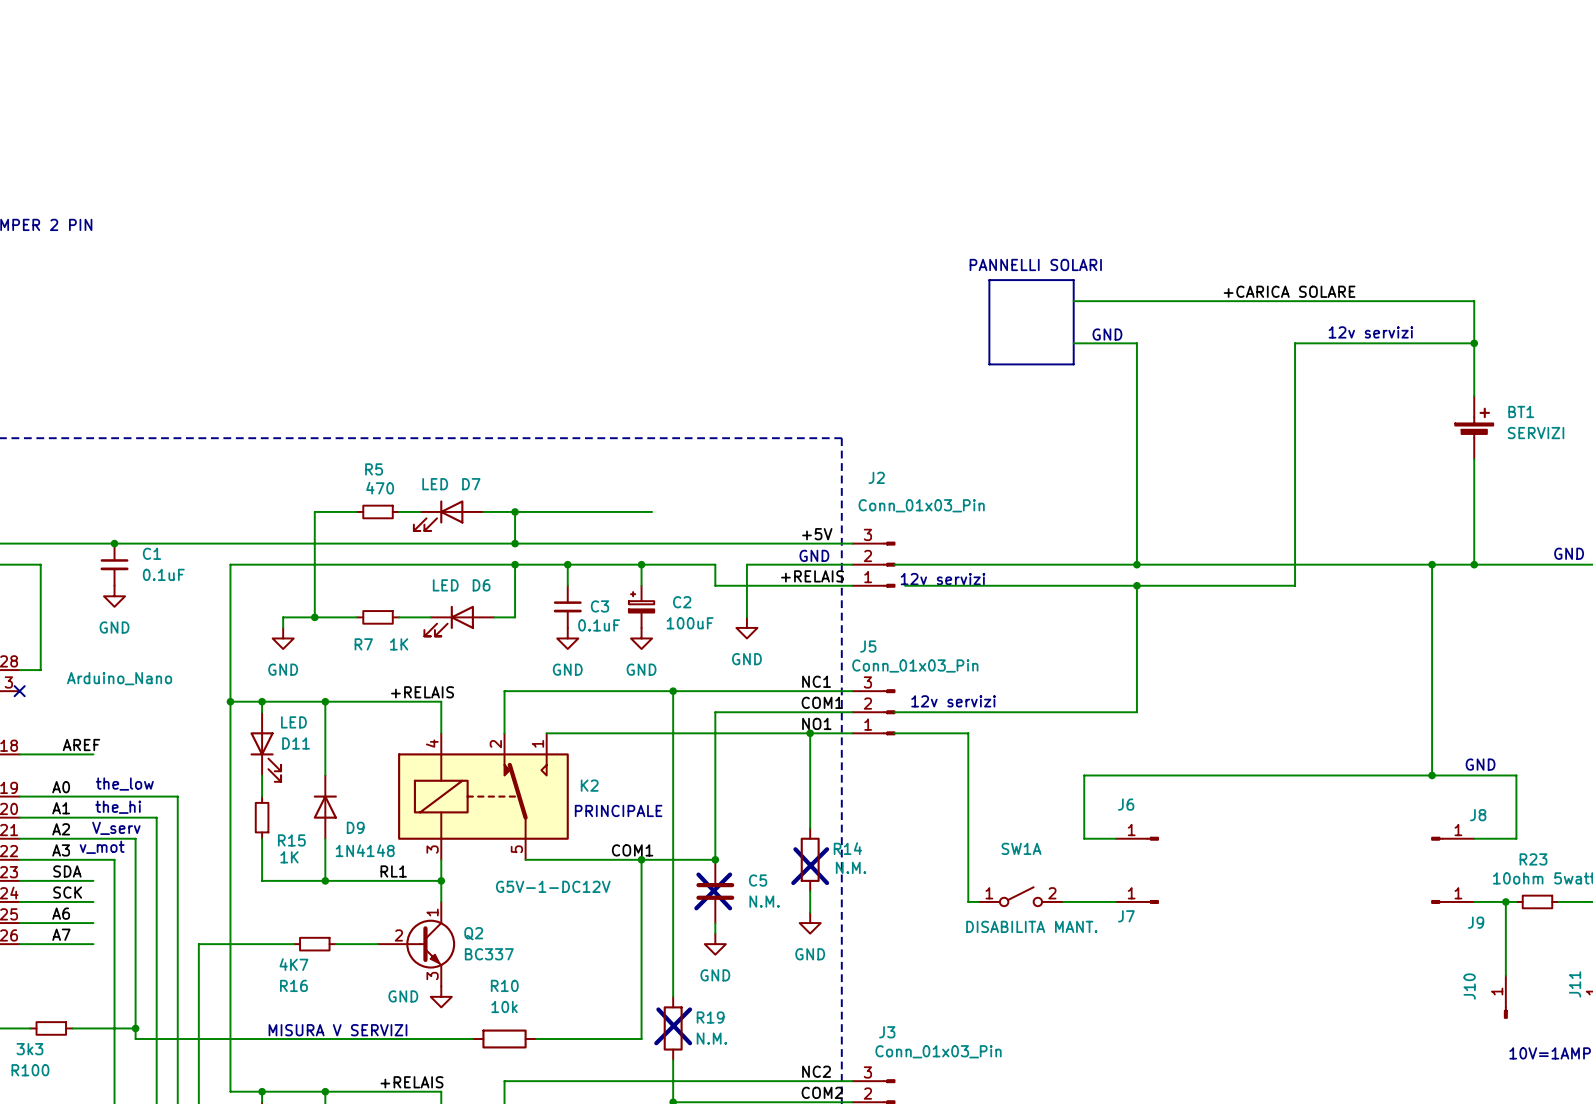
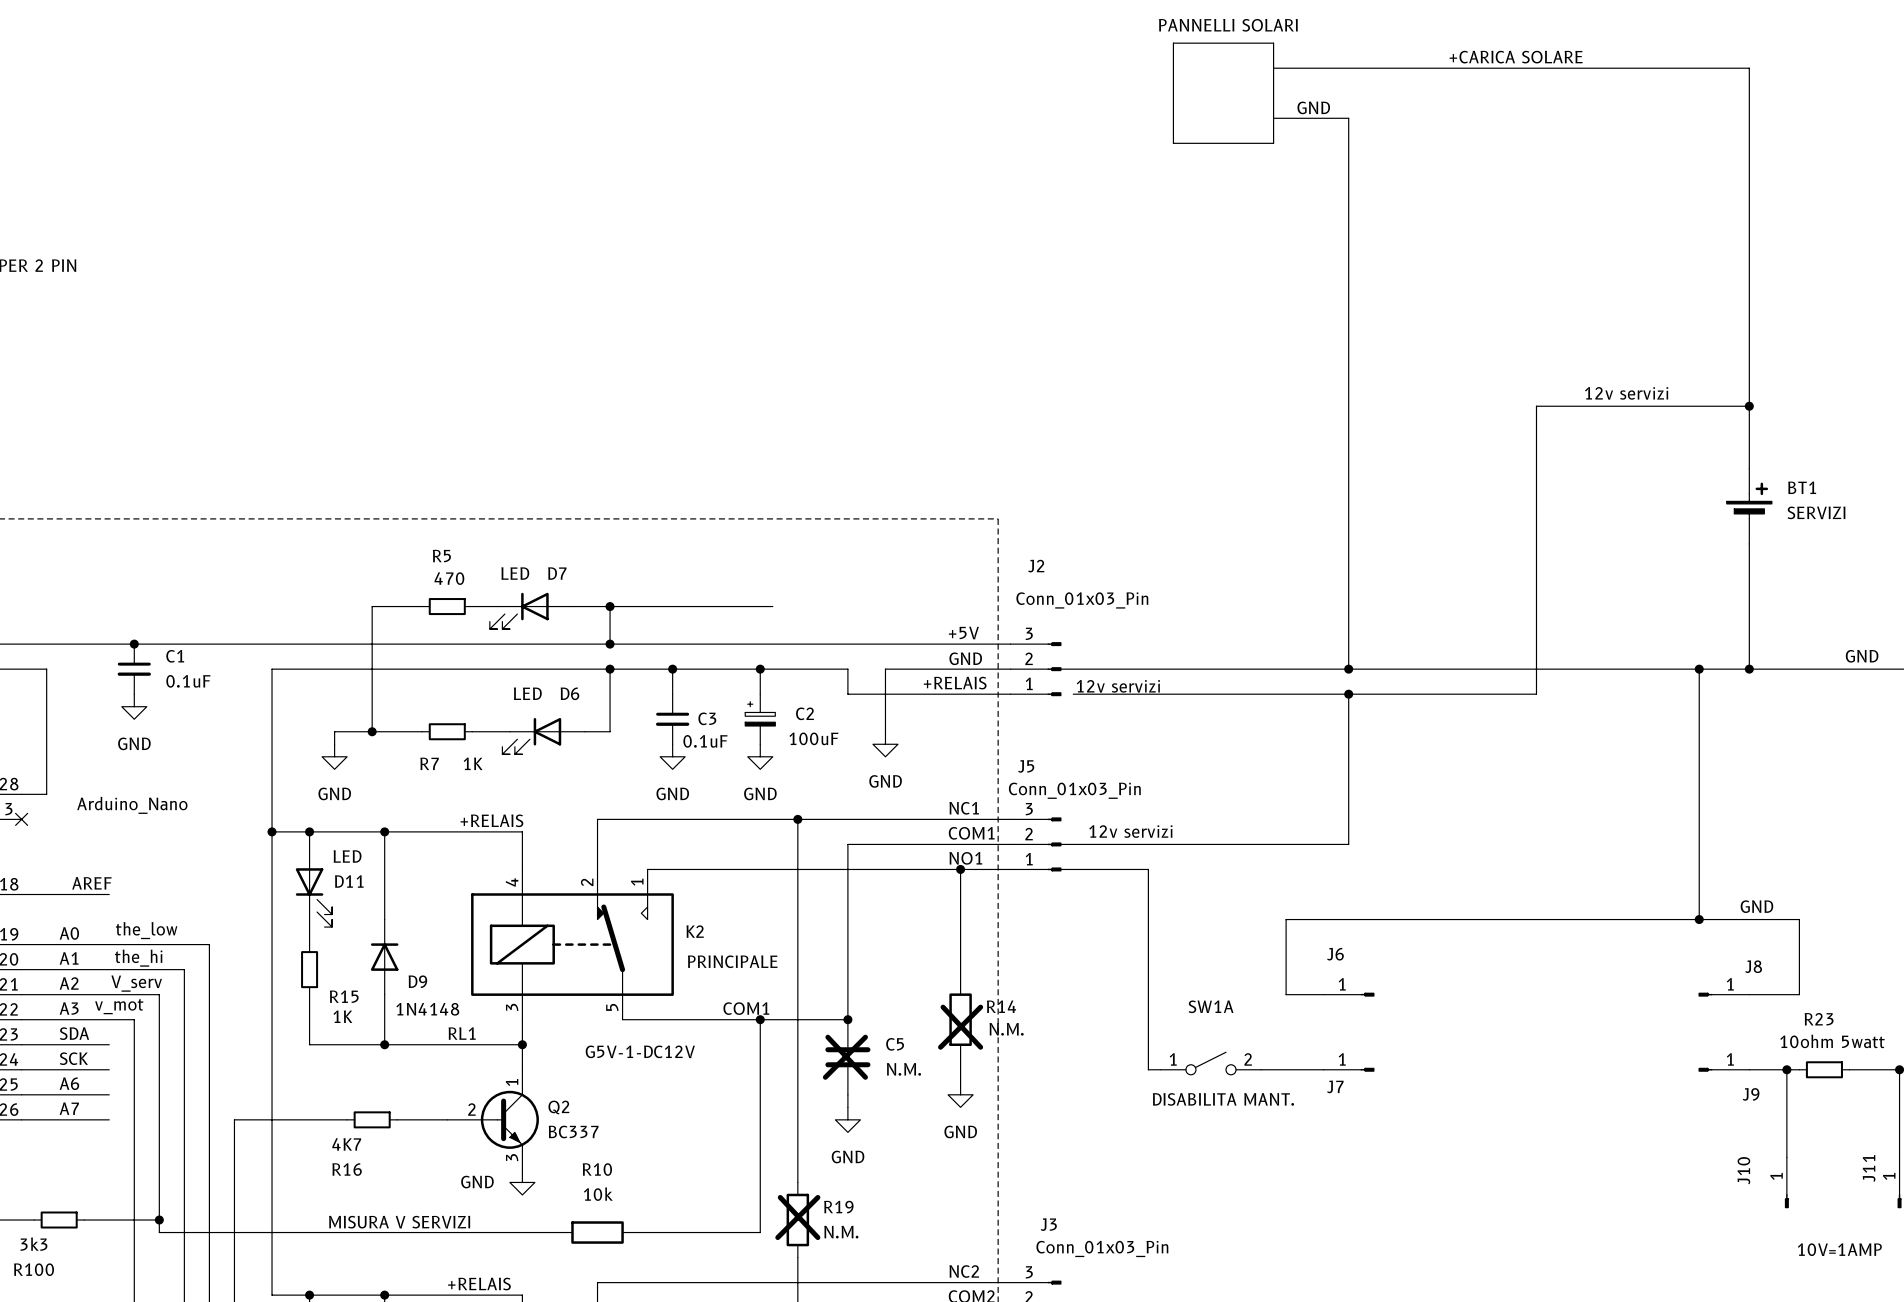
text: none -> PANNELLI SOLARI (1228, 25)
line: none -> (1173, 43) (1273, 43) (1273, 143) (1173, 143) (1173, 43)
label: none -> +CARICA SOLARE (1516, 57)
text: none -> GND (1313, 107)
text: PANNELLI SOLARI (1035, 264) -> none
line: (989, 280) (1073, 280) (1073, 364) (989, 364) (989, 280) -> none
label: +CARICA SOLARE (1289, 291) -> none
wire: (1073, 301) (1474, 301) -> (1273, 68) (1749, 68) (1749, 356)
text: GND (1107, 334) -> none
wire: (1073, 343) (1136, 343) -> (1273, 118) (1348, 118) (1348, 406)

